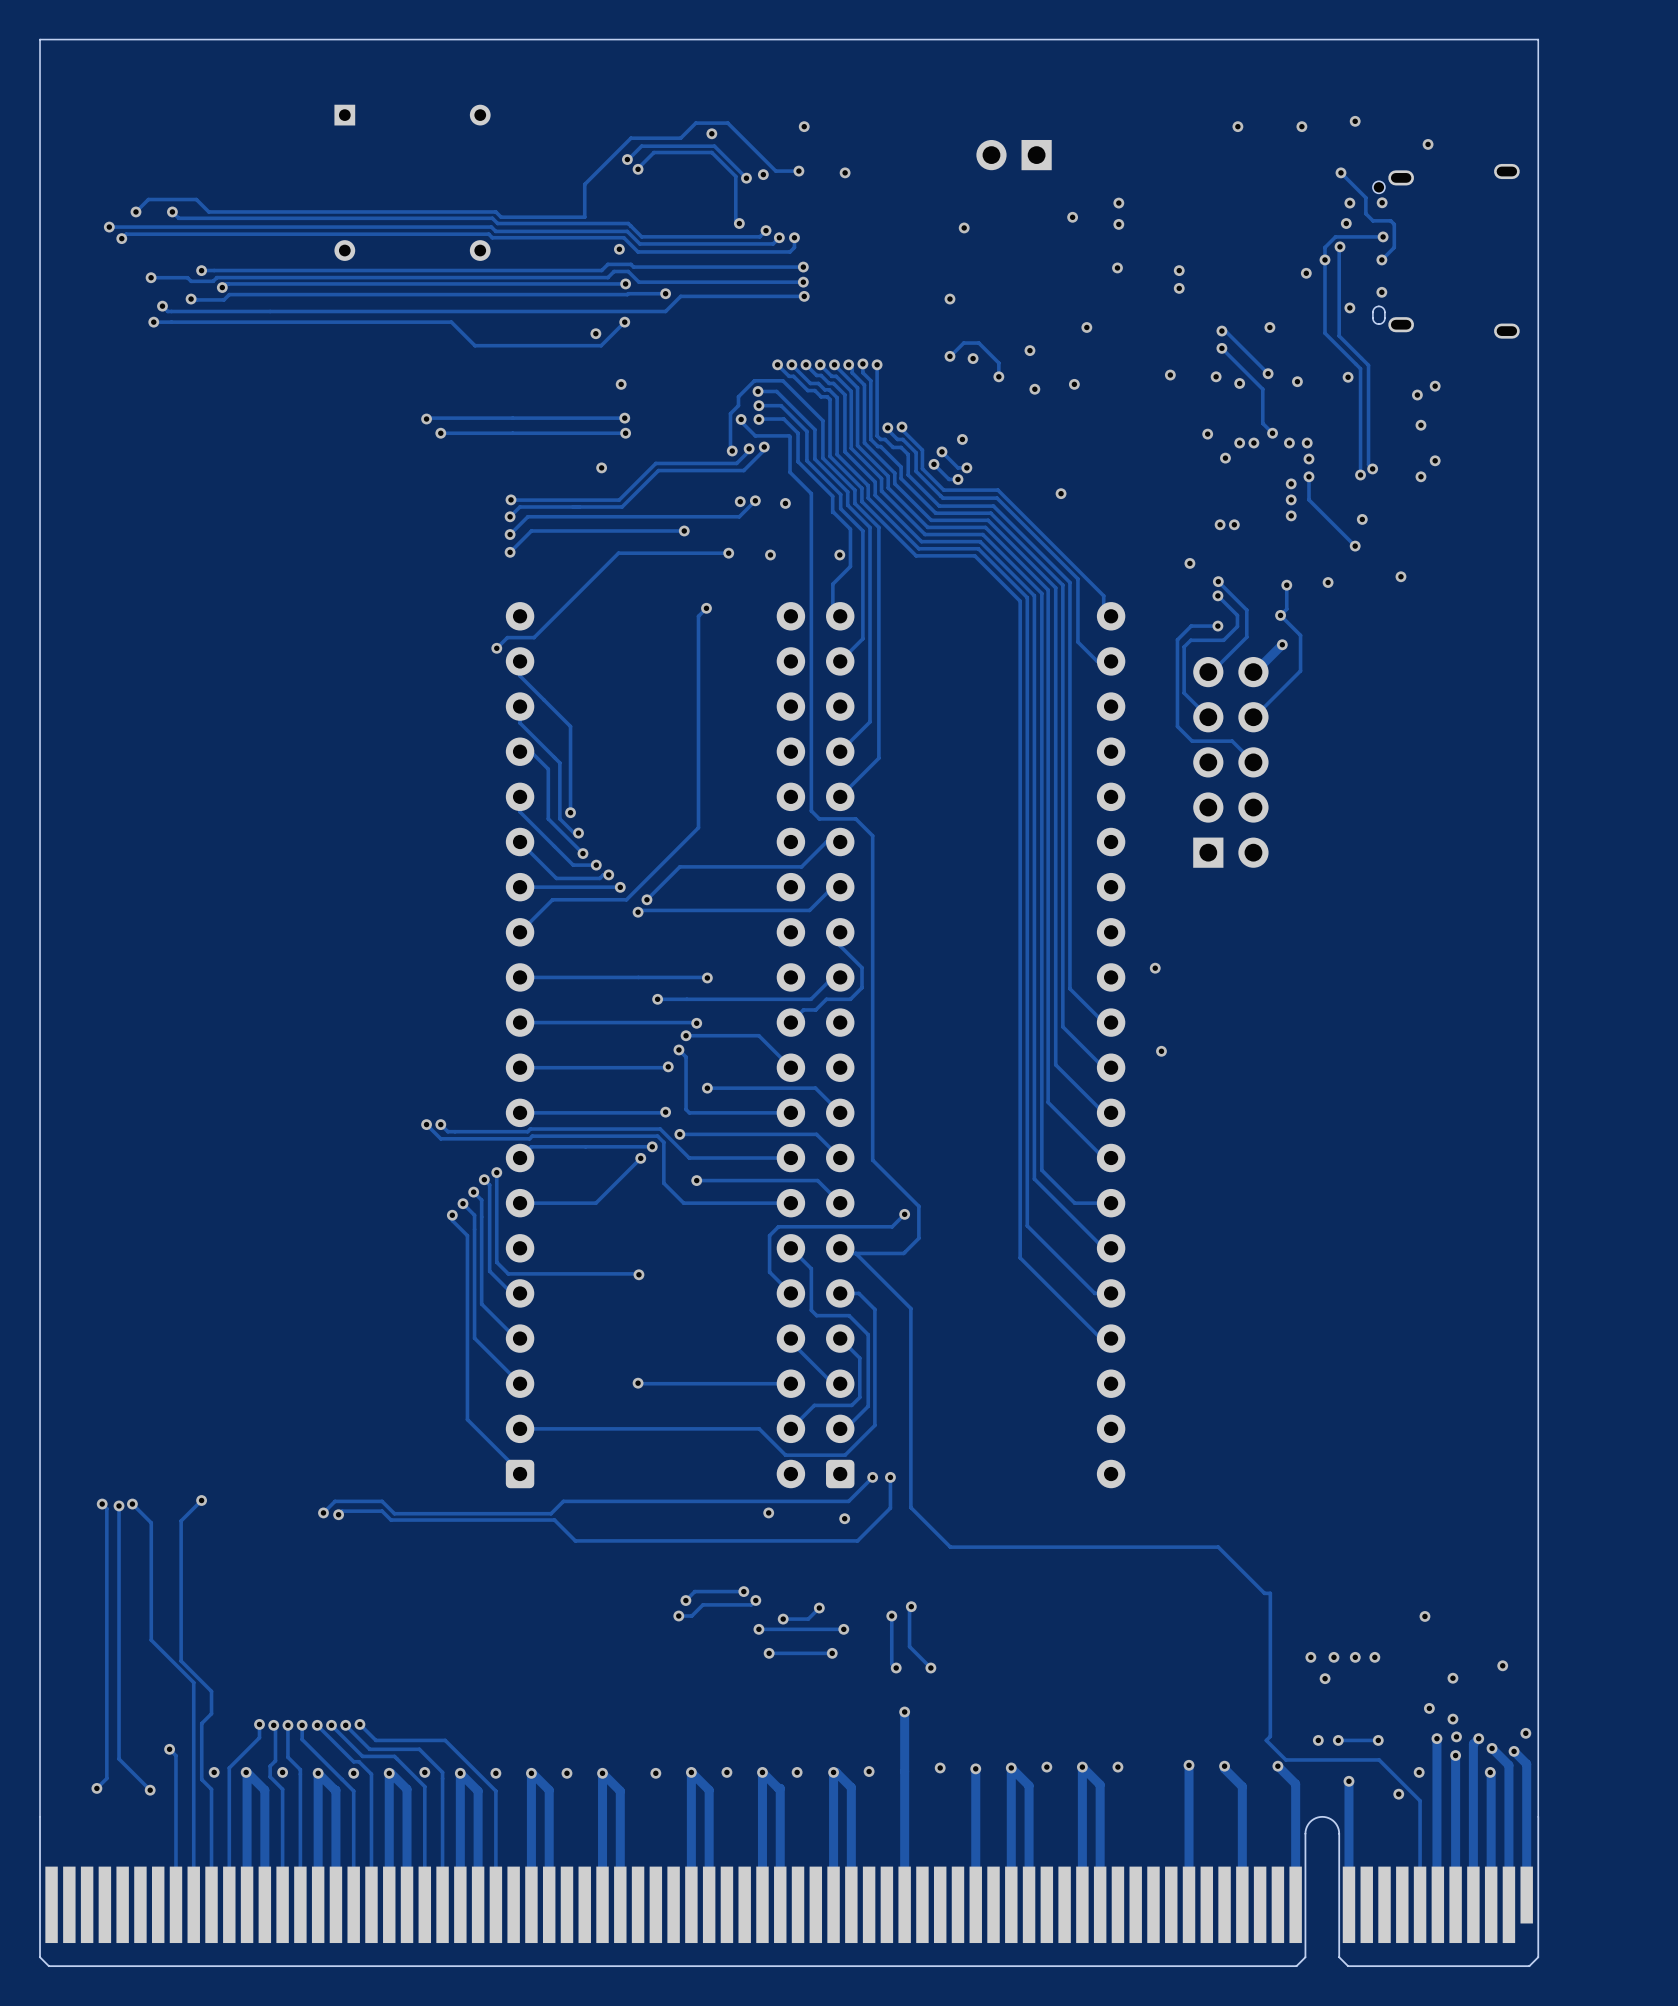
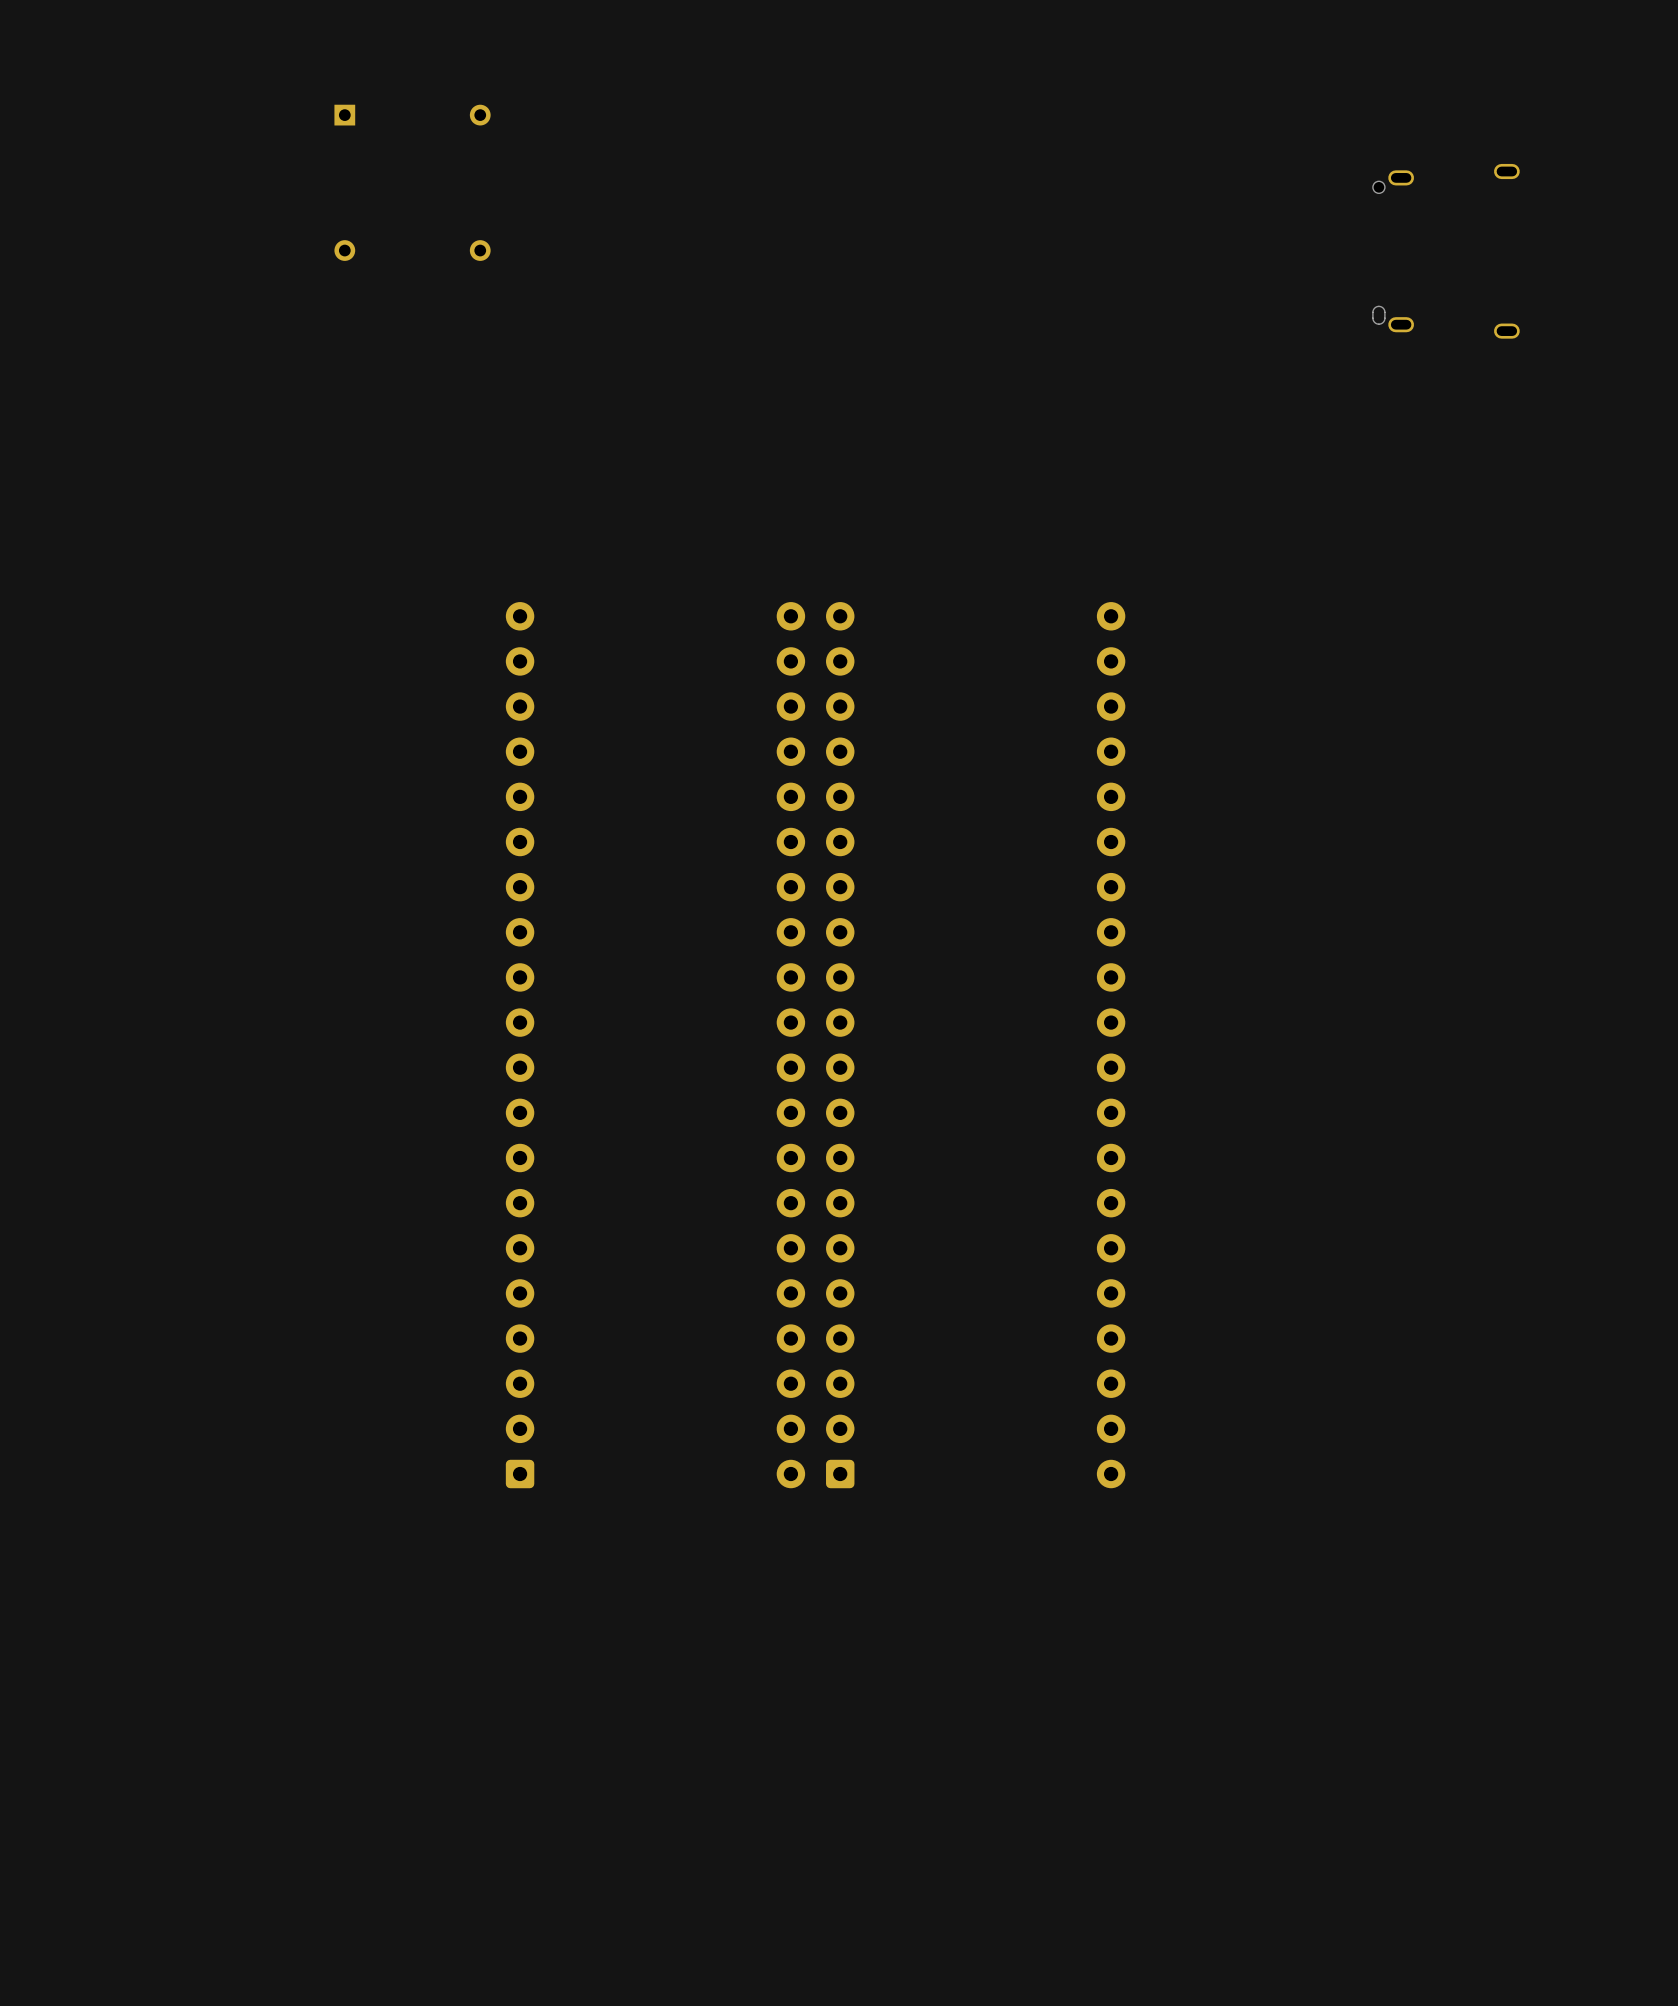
via: (1355, 121) -> none
via: (804, 126) -> none
via: (1237, 126) -> none
via: (1301, 126) -> none
via: (711, 133) -> none
via: (1428, 144) -> none
part: (1014, 155) -> none
track: (627, 159) (641, 146) (714, 146) (746, 178) -> none
via: (627, 159) -> none
track: (638, 169) (653, 152) (711, 152) (735, 176) (735, 219) (739, 223) -> none
via: (638, 169) -> none
track: (798, 171) (775, 171) (727, 123) (695, 123) (680, 138) (630, 138) (584, 184) (584, 217) (501, 217) (495, 211) (208, 211) (196, 199) (148, 199) (135, 211) -> none
via: (798, 171) -> none
via: (845, 172) -> none
track: (1340, 172) (1365, 197) (1365, 213) (1372, 220) (1390, 220) (1394, 224) (1394, 247) (1381, 259) -> none
via: (1340, 172) -> none
via: (763, 174) -> none
via: (746, 178) -> none
via: (1382, 202) -> none
via: (1118, 203) -> none
via: (1349, 203) -> none
via: (135, 211) -> none
track: (172, 211) (178, 218) (492, 218) (497, 223) (628, 223) (641, 236) (759, 236) (766, 230) -> none
via: (172, 211) -> none
via: (1072, 217) -> none
via: (739, 223) -> none
via: (1346, 223) -> none
via: (1118, 224) -> none
track: (109, 227) (491, 227) (495, 231) (627, 231) (639, 243) (773, 243) (779, 237) -> none
via: (109, 227) -> none
via: (964, 227) -> none
via: (766, 230) -> none
track: (1383, 236) (1335, 236) (1324, 247) (1324, 333) (1360, 368) (1360, 475) -> none
via: (1383, 236) -> none
via: (779, 237) -> none
track: (794, 237) (794, 247) (790, 251) (638, 251) (623, 237) (492, 237) (488, 234) (126, 234) (121, 238) -> none
via: (794, 237) -> none
via: (121, 238) -> none
track: (1340, 246) (1339, 336) (1368, 365) (1368, 464) (1372, 468) -> none
via: (1340, 246) -> none
via: (619, 249) -> none
via: (1324, 259) -> none
via: (1381, 259) -> none
track: (803, 267) (633, 267) (630, 264) (607, 264) (601, 270) (201, 270) -> none
via: (803, 267) -> none
via: (1117, 267) -> none
via: (201, 270) -> none
via: (1179, 270) -> none
via: (1306, 273) -> none
track: (151, 277) (187, 277) (191, 281) (213, 281) (216, 277) (607, 277) (614, 271) (628, 271) (638, 282) (803, 282) -> none
via: (151, 277) -> none
via: (803, 282) -> none
track: (625, 283) (225, 283) (222, 287) -> none
via: (625, 283) -> none
via: (222, 287) -> none
via: (1179, 288) -> none
via: (1381, 292) -> none
track: (665, 293) (229, 294) (223, 299) (191, 299) -> none
via: (665, 293) -> none
track: (804, 296) (680, 296) (665, 311) (167, 311) (162, 306) -> none
via: (804, 296) -> none
via: (191, 299) -> none
via: (949, 299) -> none
via: (162, 306) -> none
via: (1349, 307) -> none
via: (153, 322) -> none
track: (624, 322) (601, 345) (475, 345) (451, 322) (153, 322) -> none
via: (624, 322) -> none
via: (1086, 327) -> none
via: (1269, 327) -> none
track: (1221, 331) (1225, 331) (1268, 373) -> none
via: (1221, 331) -> none
via: (595, 333) -> none
track: (1221, 348) (1262, 389) (1262, 423) (1272, 433) -> none
via: (1221, 348) -> none
via: (1029, 350) -> none
track: (949, 356) (963, 343) (978, 343) (998, 363) (998, 376) -> none
via: (949, 356) -> none
via: (973, 358) -> none
track: (862, 363) (862, 372) (870, 380) (870, 439) (901, 467) (901, 478) (935, 513) (990, 513) (1062, 585) (1062, 1026) (1103, 1067) -> none
via: (862, 363) -> none
track: (777, 364) (789, 376) (793, 376) (807, 390) (814, 390) (821, 396) (827, 396) (830, 399) (830, 456) (861, 488) (861, 501) (916, 555) (974, 555) (1020, 601) (1020, 1257) (1100, 1338) (1111, 1338) -> none
via: (777, 364) -> none
track: (791, 364) (810, 383) (818, 383) (837, 397) (837, 454) (868, 485) (868, 498) (918, 548) (978, 548) (1027, 597) (1027, 1225) (1094, 1293) (1111, 1293) -> none
via: (791, 364) -> none
track: (806, 364) (816, 375) (821, 375) (829, 383) (833, 383) (844, 394) (844, 451) (875, 482) (875, 495) (921, 541) (980, 541) (1034, 595) (1034, 1178) (1103, 1248) -> none
via: (806, 364) -> none
track: (820, 364) (831, 376) (836, 376) (851, 391) (851, 448) (881, 478) (881, 491) (925, 534) (982, 534) (1041, 593) (1041, 1170) (1074, 1203) (1103, 1203) -> none
via: (820, 364) -> none
track: (834, 364) (857, 387) (857, 445) (888, 476) (888, 487) (927, 527) (985, 527) (1048, 590) (1048, 1102) (1103, 1158) -> none
via: (834, 364) -> none
track: (848, 364) (852, 368) (852, 372) (864, 385) (864, 442) (894, 473) (894, 483) (931, 520) (988, 520) (1055, 587) (1055, 1064) (1103, 1112) -> none
via: (848, 364) -> none
track: (877, 364) (877, 435) (880, 439) (885, 439) (893, 447) (901, 447) (908, 454) (908, 475) (939, 506) (993, 506) (1069, 582) (1069, 988) (1103, 1022) -> none
via: (877, 364) -> none
via: (1268, 373) -> none
via: (1170, 375) -> none
via: (998, 376) -> none
via: (1216, 376) -> none
via: (1348, 377) -> none
via: (1297, 381) -> none
via: (1239, 383) -> none
via: (621, 384) -> none
via: (1074, 384) -> none
via: (1435, 386) -> none
via: (1034, 389) -> none
track: (758, 391) (776, 391) (814, 429) (814, 459) (847, 491) (847, 505) (870, 527) (870, 721) (840, 751) -> none
via: (758, 391) -> none
via: (1417, 395) -> none
track: (758, 405) (781, 405) (806, 431) (806, 460) (840, 494) (840, 508) (862, 530) (862, 638) (840, 661) -> none
via: (758, 405) -> none
track: (624, 418) (426, 419) -> none
via: (624, 418) -> none
via: (426, 419) -> none
via: (741, 419) -> none
track: (758, 419) (783, 419) (798, 433) (798, 461) (832, 496) (832, 512) (850, 529) (850, 566) (832, 584) (832, 616) -> none
via: (758, 419) -> none
track: (741, 421) (755, 435) (790, 436) (790, 472) (811, 493) (811, 810) (819, 818) (855, 818) (872, 835) (872, 1160) (918, 1206) (918, 1238) (903, 1253) (845, 1253) (840, 1248) -> none
via: (1420, 425) -> none
track: (886, 427) (897, 439) (902, 439) (916, 452) (916, 471) (942, 498) (997, 498) (1077, 579) (1077, 642) (1097, 661) (1103, 661) -> none
via: (887, 427) -> none
track: (901, 427) (901, 429) (922, 450) (922, 468) (943, 490) (997, 490) (1103, 595) (1103, 616) -> none
via: (901, 427) -> none
via: (440, 433) -> none
track: (625, 433) (440, 433) -> none
via: (625, 433) -> none
via: (1272, 433) -> none
via: (1207, 434) -> none
via: (962, 439) -> none
via: (1239, 443) -> none
via: (1253, 443) -> none
via: (1289, 443) -> none
via: (1307, 443) -> none
via: (764, 447) -> none
via: (749, 448) -> none
track: (764, 450) (743, 470) (658, 470) (622, 506) (519, 506) (510, 516) -> none
track: (732, 451) (730, 449) (730, 413) (738, 405) (738, 396) (754, 380) (782, 380) (822, 420) (822, 458) (854, 490) (854, 503) (878, 527) (878, 758) (840, 796) -> none
via: (732, 451) -> none
track: (749, 451) (736, 463) (655, 463) (619, 500) (515, 500) -> none
track: (941, 451) (957, 467) (966, 467) -> none
via: (941, 451) -> none
via: (1225, 458) -> none
via: (1308, 459) -> none
via: (1435, 460) -> none
track: (933, 464) (949, 479) (957, 479) -> none
via: (933, 464) -> none
via: (601, 467) -> none
via: (966, 467) -> none
via: (1372, 468) -> none
via: (1360, 475) -> none
track: (1308, 476) (1308, 499) (1355, 546) -> none
via: (1308, 476) -> none
via: (1420, 476) -> none
via: (957, 479) -> none
via: (1291, 483) -> none
via: (1061, 493) -> none
via: (510, 499) -> none
via: (1291, 499) -> none
track: (755, 500) (739, 516) (527, 516) (510, 534) -> none
via: (755, 500) -> none
via: (740, 501) -> none
via: (785, 503) -> none
via: (1291, 515) -> none
via: (510, 516) -> none
via: (1362, 519) -> none
via: (1220, 524) -> none
via: (1234, 524) -> none
track: (684, 530) (531, 530) (510, 552) -> none
via: (684, 530) -> none
via: (510, 534) -> none
via: (1355, 546) -> none
via: (510, 552) -> none
track: (728, 553) (618, 553) (534, 637) (507, 637) (496, 648) -> none
via: (728, 553) -> none
via: (770, 554) -> none
via: (839, 554) -> none
via: (1189, 563) -> none
via: (1400, 576) -> none
track: (1218, 581) (1246, 610) (1246, 637) (1211, 672) (1208, 672) -> none
via: (1218, 581) -> none
via: (1328, 582) -> none
track: (1286, 585) (1286, 609) (1280, 615) (1300, 635) (1300, 670) (1253, 717) -> none
via: (1286, 585) -> none
track: (1217, 595) (1237, 615) (1237, 626) (1223, 640) (1190, 640) (1184, 646) (1184, 693) (1208, 717) -> none
via: (1217, 595) -> none
track: (706, 608) (698, 616) (698, 827) (626, 899) (552, 899) (520, 932) -> none
via: (706, 608) -> none
via: (1280, 615) -> none
track: (1217, 626) (1191, 626) (1177, 639) (1177, 726) (1192, 741) (1232, 741) (1253, 762) -> none
via: (1217, 626) -> none
track: (1282, 644) (1253, 672) -> none
via: (1282, 644) -> none
via: (496, 648) -> none
track: (520, 661) (520, 676) (570, 726) (570, 812) -> none
track: (520, 706) (520, 723) (559, 762) (559, 818) (574, 833) (578, 833) -> none
track: (520, 751) (530, 751) (548, 769) (548, 818) (582, 853) -> none
part: (1230, 762) -> none
track: (520, 796) (520, 811) (573, 865) (596, 865) -> none
via: (570, 812) -> none
via: (578, 833) -> none
track: (520, 842) (556, 878) (599, 878) (603, 874) (608, 874) -> none
track: (840, 842) (826, 842) (801, 866) (679, 866) (646, 899) -> none
via: (582, 853) -> none
via: (596, 865) -> none
via: (608, 874) -> none
track: (620, 887) (520, 887) -> none
via: (620, 887) -> none
track: (840, 887) (832, 887) (809, 910) (639, 910) (638, 912) -> none
via: (646, 899) -> none
via: (638, 912) -> none
track: (840, 932) (840, 945) (862, 967) (862, 987) (850, 999) (826, 999) (815, 1009) (803, 1009) (790, 1022) -> none
via: (1155, 968) -> none
track: (520, 977) (707, 977) -> none
via: (707, 977) -> none
track: (832, 977) (810, 999) (657, 999) -> none
via: (657, 999) -> none
track: (692, 1022) (520, 1022) -> none
via: (696, 1023) -> none
track: (683, 1035) (758, 1035) (790, 1067) -> none
via: (686, 1035) -> none
track: (678, 1049) (686, 1057) (686, 1109) (689, 1112) (790, 1112) -> none
via: (678, 1049) -> none
via: (1161, 1051) -> none
track: (668, 1066) (520, 1067) -> none
via: (668, 1066) -> none
track: (707, 1088) (815, 1088) (840, 1112) -> none
via: (707, 1088) -> none
track: (665, 1112) (520, 1112) -> none
via: (665, 1112) -> none
track: (426, 1124) (440, 1138) (529, 1138) (532, 1136) (657, 1136) (663, 1142) (663, 1183) (683, 1203) (790, 1203) -> none
via: (426, 1124) -> none
track: (440, 1124) (447, 1131) (527, 1131) (530, 1129) (660, 1129) (689, 1158) (790, 1157) -> none
via: (440, 1124) -> none
track: (679, 1134) (816, 1134) (840, 1158) -> none
via: (679, 1134) -> none
track: (652, 1146) (531, 1146) (520, 1158) -> none
via: (652, 1146) -> none
track: (640, 1158) (595, 1203) (520, 1203) -> none
via: (640, 1158) -> none
via: (496, 1172) -> none
track: (496, 1175) (496, 1262) (508, 1273) (638, 1274) -> none
track: (484, 1179) (489, 1185) (489, 1271) (511, 1293) (520, 1293) -> none
via: (484, 1179) -> none
track: (693, 1180) (817, 1180) (840, 1203) -> none
via: (696, 1180) -> none
track: (473, 1192) (481, 1200) (481, 1304) (516, 1338) (520, 1338) -> none
via: (473, 1192) -> none
track: (463, 1203) (474, 1215) (474, 1338) (520, 1383) -> none
via: (463, 1203) -> none
track: (904, 1214) (892, 1226) (778, 1226) (769, 1235) (769, 1272) (790, 1293) -> none
via: (904, 1214) -> none
track: (452, 1215) (452, 1220) (467, 1235) (467, 1419) (520, 1474) -> none
via: (452, 1215) -> none
track: (790, 1248) (811, 1268) (811, 1310) (816, 1315) (849, 1315) (868, 1334) (868, 1406) (845, 1428) (832, 1428) -> none
track: (855, 1253) (910, 1308) (910, 1507) (950, 1547) (1218, 1547) (1264, 1593) (1270, 1593) (1270, 1736) (1266, 1740) (1285, 1759) (1379, 1759) (1420, 1800) (1420, 1904) -> none
via: (638, 1274) -> none
track: (832, 1293) (858, 1293) (874, 1309) (874, 1425) (845, 1455) (785, 1455) (759, 1428) (520, 1428) -> none
track: (790, 1338) (790, 1341) (832, 1383) -> none
track: (840, 1338) (859, 1358) (859, 1397) (851, 1405) (814, 1405) (790, 1428) -> none
track: (638, 1383) (790, 1383) -> none
via: (638, 1383) -> none
track: (872, 1477) (848, 1501) (563, 1501) (551, 1513) (394, 1513) (382, 1501) (335, 1501) (323, 1512) -> none
via: (872, 1477) -> none
track: (890, 1477) (890, 1508) (857, 1540) (575, 1540) (554, 1520) (391, 1520) (382, 1511) (342, 1511) (338, 1514) -> none
via: (890, 1477) -> none
track: (201, 1500) (181, 1520) (181, 1661) (211, 1691) (211, 1713) (201, 1723) (201, 1779) (211, 1789) (211, 1904) -> none
via: (201, 1500) -> none
track: (102, 1504) (106, 1508) (106, 1778) (96, 1788) -> none
via: (102, 1504) -> none
track: (132, 1504) (151, 1522) (151, 1640) (193, 1682) (193, 1904) -> none
via: (132, 1504) -> none
track: (119, 1505) (119, 1759) (150, 1790) -> none
via: (119, 1505) -> none
via: (323, 1512) -> none
via: (768, 1512) -> none
via: (338, 1514) -> none
via: (844, 1518) -> none
track: (743, 1591) (694, 1591) (685, 1600) -> none
via: (743, 1591) -> none
via: (685, 1600) -> none
track: (755, 1600) (751, 1604) (702, 1604) (691, 1616) (678, 1616) -> none
via: (755, 1600) -> none
track: (911, 1606) (909, 1608) (909, 1646) (930, 1668) -> none
via: (911, 1606) -> none
track: (819, 1608) (808, 1619) (783, 1619) -> none
via: (819, 1608) -> none
via: (678, 1616) -> none
track: (891, 1616) (891, 1664) (896, 1668) -> none
via: (891, 1616) -> none
via: (1424, 1616) -> none
via: (783, 1619) -> none
via: (758, 1629) -> none
via: (843, 1629) -> none
track: (844, 1629) (758, 1629) -> none
via: (769, 1653) -> none
track: (832, 1653) (769, 1653) -> none
via: (832, 1653) -> none
via: (1310, 1657) -> none
via: (1333, 1657) -> none
via: (1355, 1657) -> none
via: (1374, 1657) -> none
via: (1502, 1665) -> none
via: (896, 1668) -> none
via: (930, 1668) -> none
via: (1325, 1678) -> none
via: (1452, 1678) -> none
via: (1429, 1708) -> none
track: (904, 1711) (904, 1904) -> none
via: (904, 1711) -> none
via: (1452, 1719) -> none
track: (259, 1724) (259, 1737) (229, 1767) (229, 1904) -> none
via: (259, 1724) -> none
track: (359, 1724) (375, 1740) (445, 1740) (495, 1791) (495, 1904) -> none
via: (359, 1724) -> none
track: (273, 1725) (275, 1727) (275, 1760) (270, 1766) (270, 1776) (282, 1789) (282, 1904) -> none
via: (273, 1725) -> none
track: (287, 1725) (287, 1757) (300, 1769) (300, 1904) -> none
via: (287, 1725) -> none
track: (302, 1725) (302, 1739) (353, 1791) (353, 1904) -> none
via: (302, 1725) -> none
track: (317, 1725) (353, 1761) (359, 1761) (371, 1774) (371, 1904) -> none
via: (317, 1725) -> none
track: (331, 1725) (362, 1756) (394, 1756) (424, 1786) (424, 1904) -> none
via: (331, 1725) -> none
track: (345, 1725) (369, 1749) (419, 1749) (442, 1772) (442, 1904) -> none
via: (345, 1725) -> none
via: (1525, 1733) -> none
via: (1456, 1736) -> none
track: (1436, 1738) (1437, 1904) -> none
via: (1436, 1738) -> none
track: (1478, 1738) (1473, 1743) (1473, 1904) -> none
via: (1478, 1738) -> none
via: (1318, 1740) -> none
via: (1338, 1740) -> none
track: (1378, 1740) (1338, 1740) -> none
via: (1378, 1740) -> none
track: (1492, 1748) (1508, 1765) (1508, 1904) -> none
via: (1492, 1748) -> none
track: (169, 1749) (175, 1755) (175, 1904) -> none
via: (169, 1749) -> none
track: (1514, 1751) (1526, 1764) (1526, 1895) -> none
via: (1514, 1751) -> none
track: (1455, 1755) (1455, 1904) -> none
via: (1455, 1755) -> none
track: (1189, 1765) (1189, 1904) -> none
via: (1189, 1765) -> none
track: (1224, 1766) (1224, 1768) (1242, 1786) (1242, 1904) -> none
via: (1224, 1766) -> none
track: (1277, 1766) (1295, 1783) (1295, 1904) -> none
via: (1277, 1766) -> none
via: (940, 1767) -> none
via: (1011, 1767) -> none
via: (1046, 1767) -> none
via: (1082, 1767) -> none
via: (1117, 1767) -> none
track: (975, 1768) (975, 1904) -> none
via: (975, 1768) -> none
via: (869, 1771) -> none
via: (214, 1772) -> none
via: (246, 1772) -> none
via: (282, 1772) -> none
via: (424, 1772) -> none
via: (691, 1772) -> none
via: (726, 1772) -> none
via: (762, 1772) -> none
via: (797, 1772) -> none
via: (833, 1772) -> none
via: (1419, 1772) -> none
track: (1490, 1772) (1491, 1904) -> none
via: (1490, 1772) -> none
via: (318, 1773) -> none
via: (353, 1773) -> none
via: (389, 1773) -> none
via: (460, 1773) -> none
via: (495, 1773) -> none
via: (531, 1773) -> none
via: (566, 1773) -> none
via: (602, 1773) -> none
via: (655, 1773) -> none
track: (1348, 1781) (1348, 1904) -> none
via: (1348, 1781) -> none
via: (96, 1788) -> none
via: (150, 1790) -> none
via: (1398, 1794) -> none
board edge: (1538, 1816) (1538, 39) (40, 39) (40, 1816) -> none
part: (789, 1891) -> none
track: (264, 1904) (264, 1790) (246, 1772) (247, 1904) -> none
track: (335, 1904) (335, 1790) (318, 1773) (318, 1904) -> none
track: (407, 1904) (407, 1789) (391, 1773) (389, 1773) (389, 1904) -> none
track: (478, 1904) (478, 1791) (460, 1773) (460, 1904) -> none
track: (549, 1904) (549, 1790) (532, 1773) (531, 1904) -> none
track: (620, 1904) (620, 1791) (602, 1773) (602, 1904) -> none
track: (709, 1904) (709, 1790) (691, 1772) (691, 1904) -> none
track: (780, 1904) (780, 1788) (762, 1772) (762, 1904) -> none
track: (851, 1904) (851, 1787) (836, 1772) (833, 1772) (833, 1904) -> none
track: (1029, 1904) (1029, 1785) (1011, 1767) (1011, 1904) -> none
track: (1100, 1904) (1100, 1784) (1082, 1767) (1082, 1904) -> none

